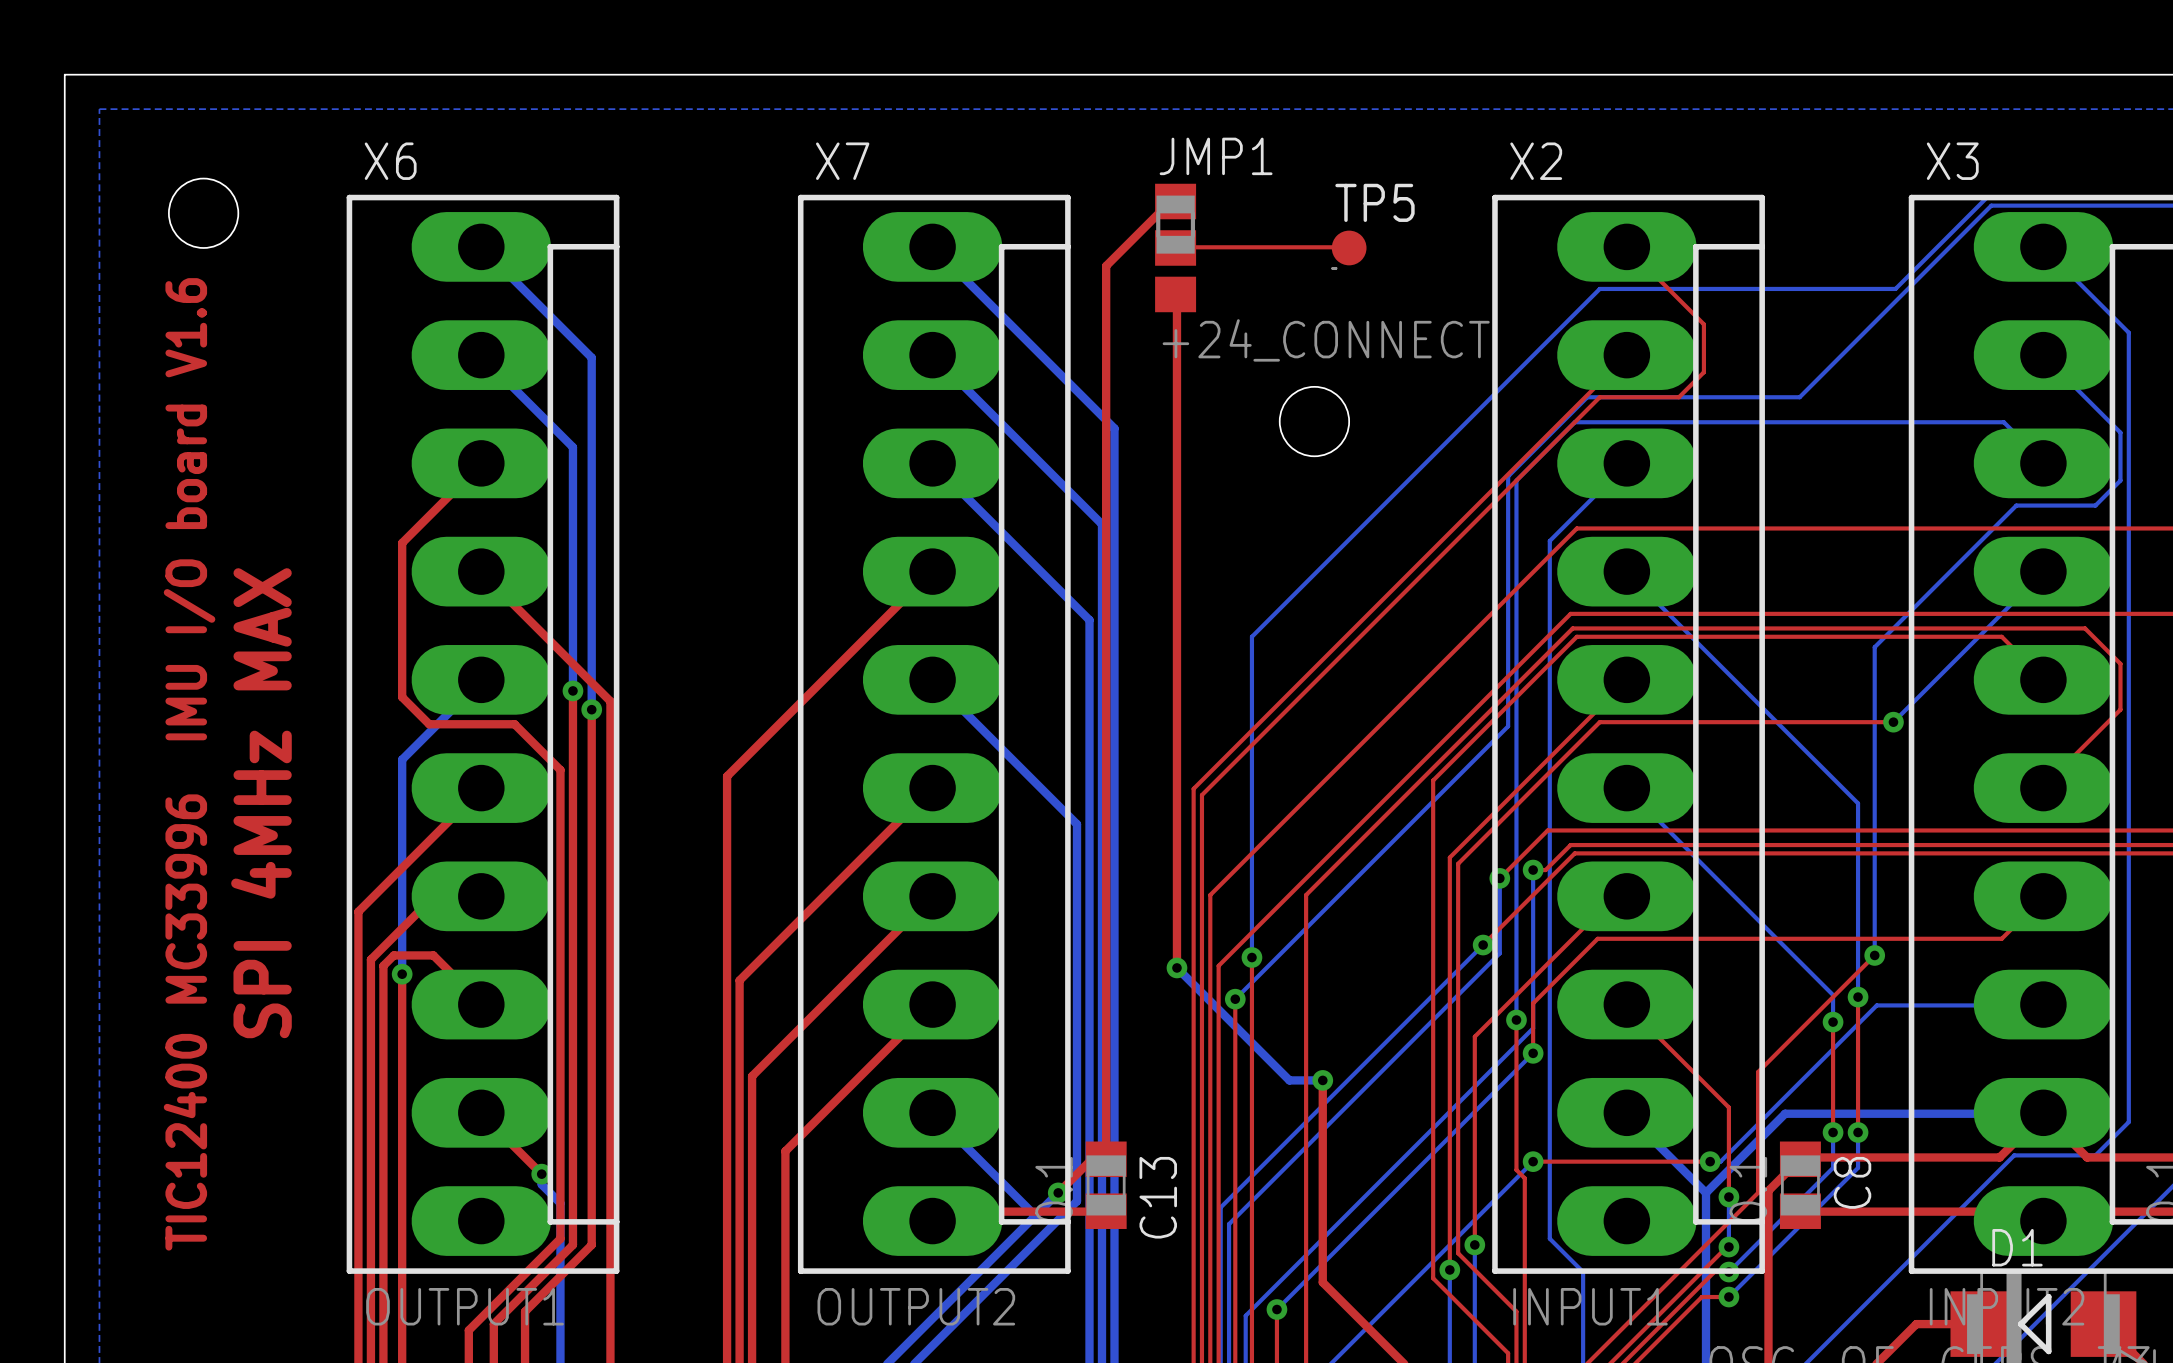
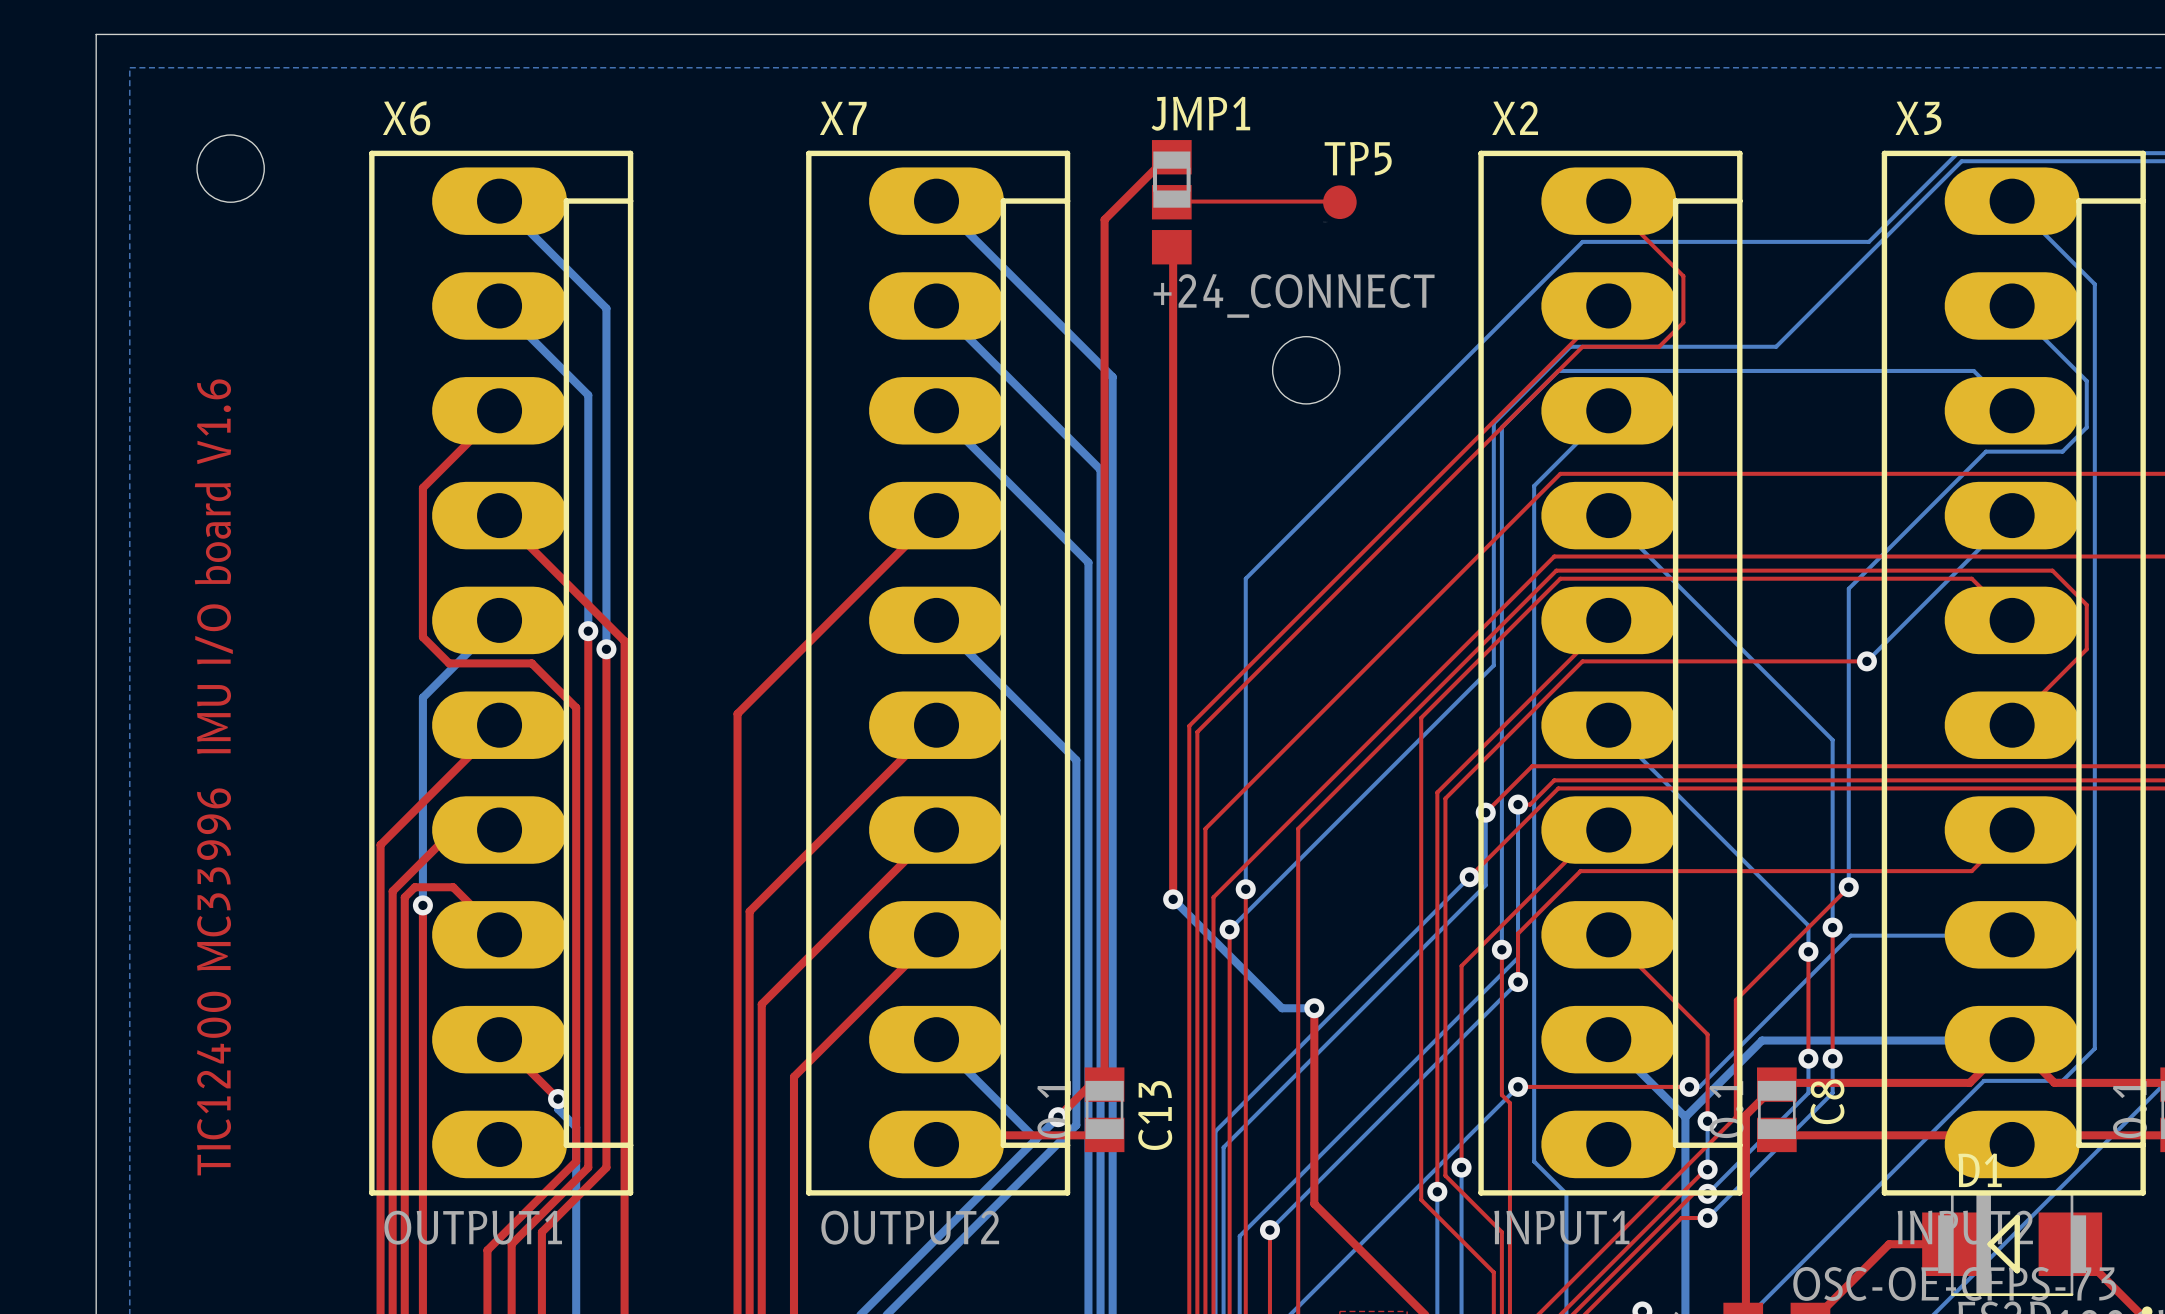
text: SPI 4MHz MAX (261, 803) -> none

